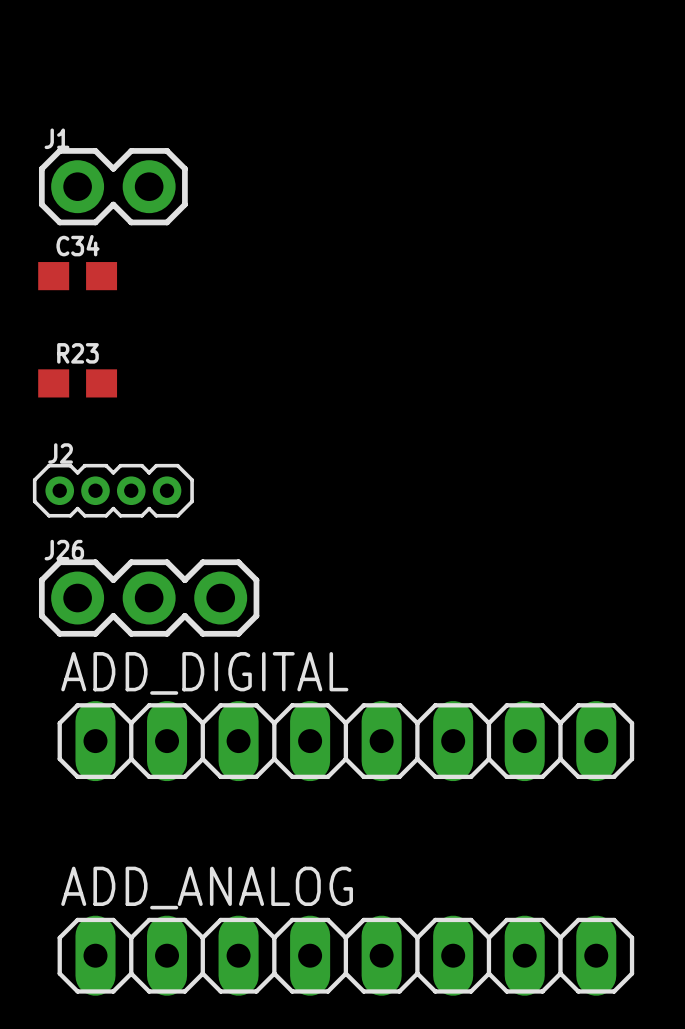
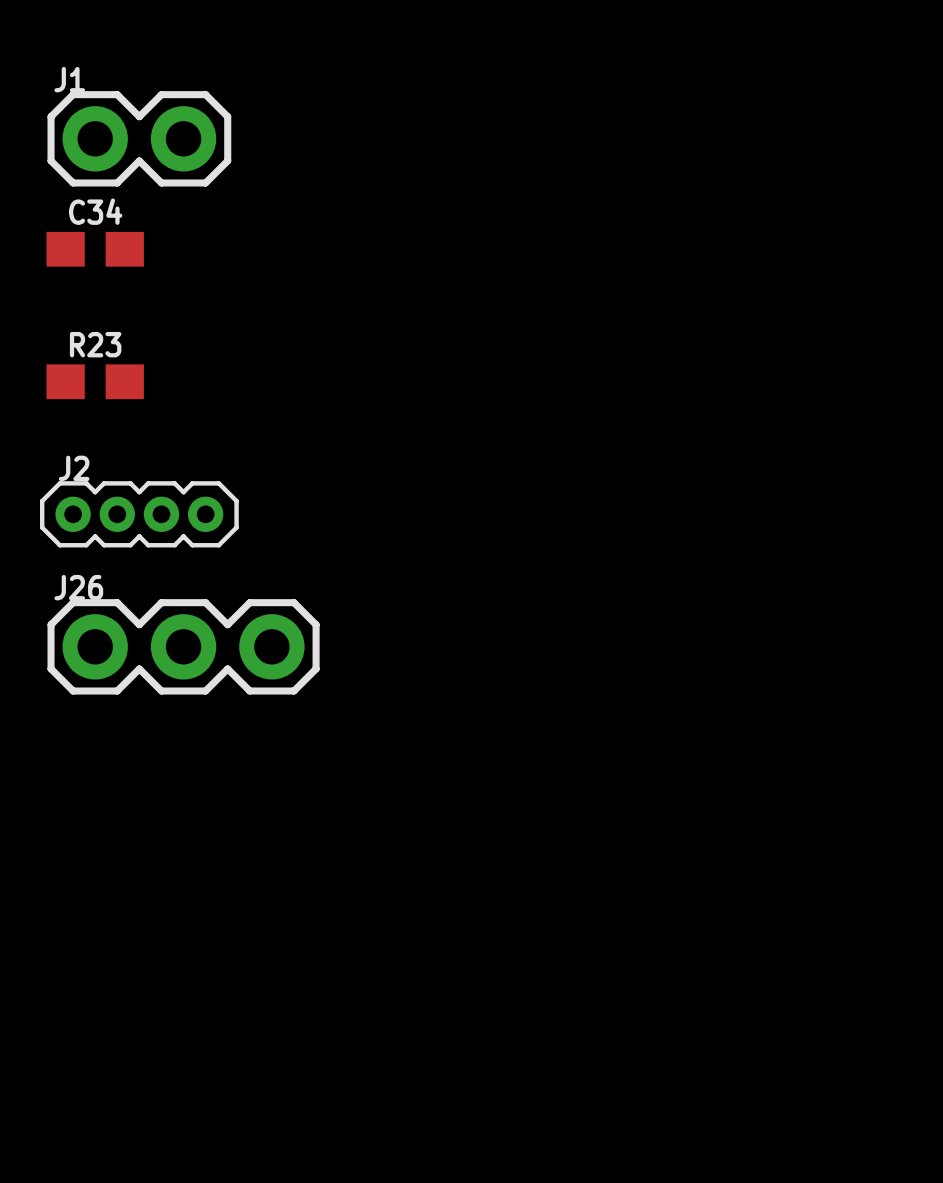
ADD_DIGITAL: (345, 741) -> none
ADD_ANALOG: (345, 955) -> none

